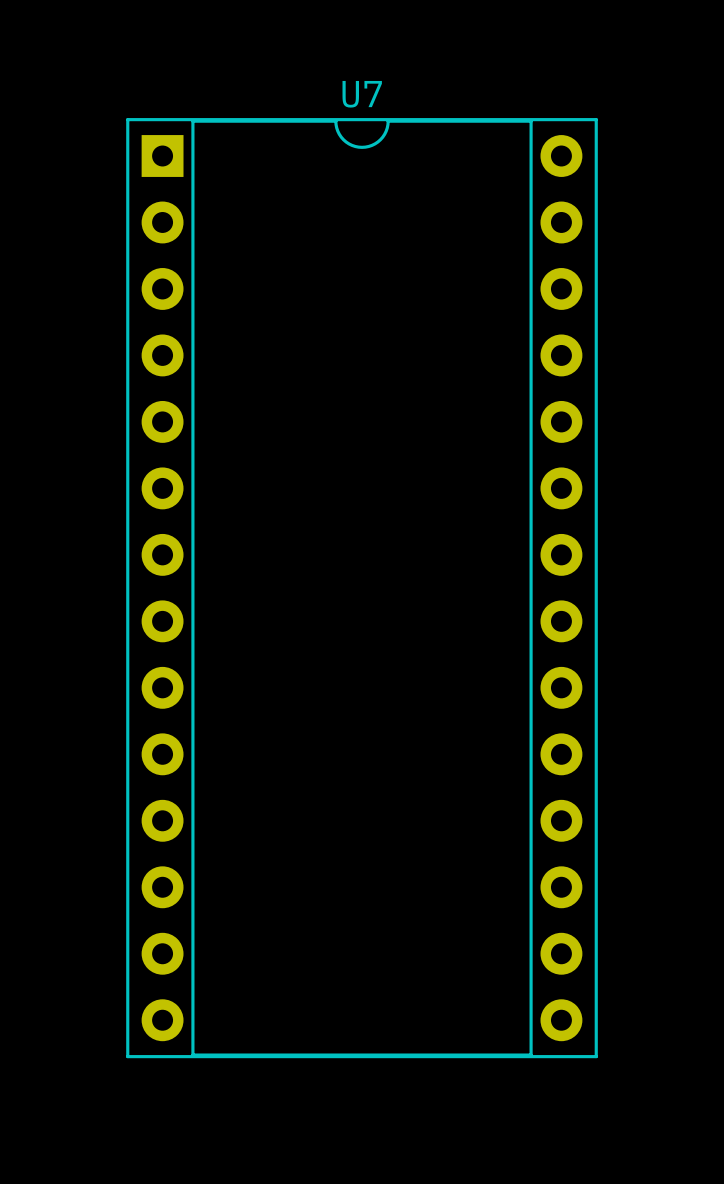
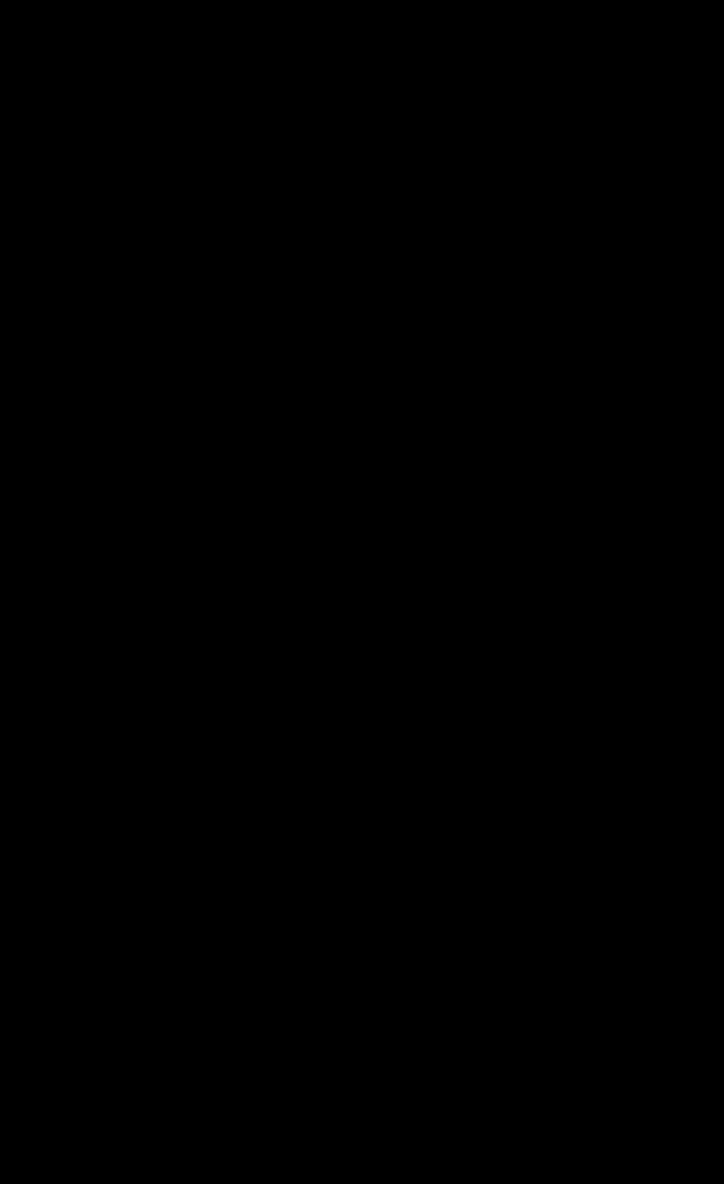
U7: (362, 588) -> none

